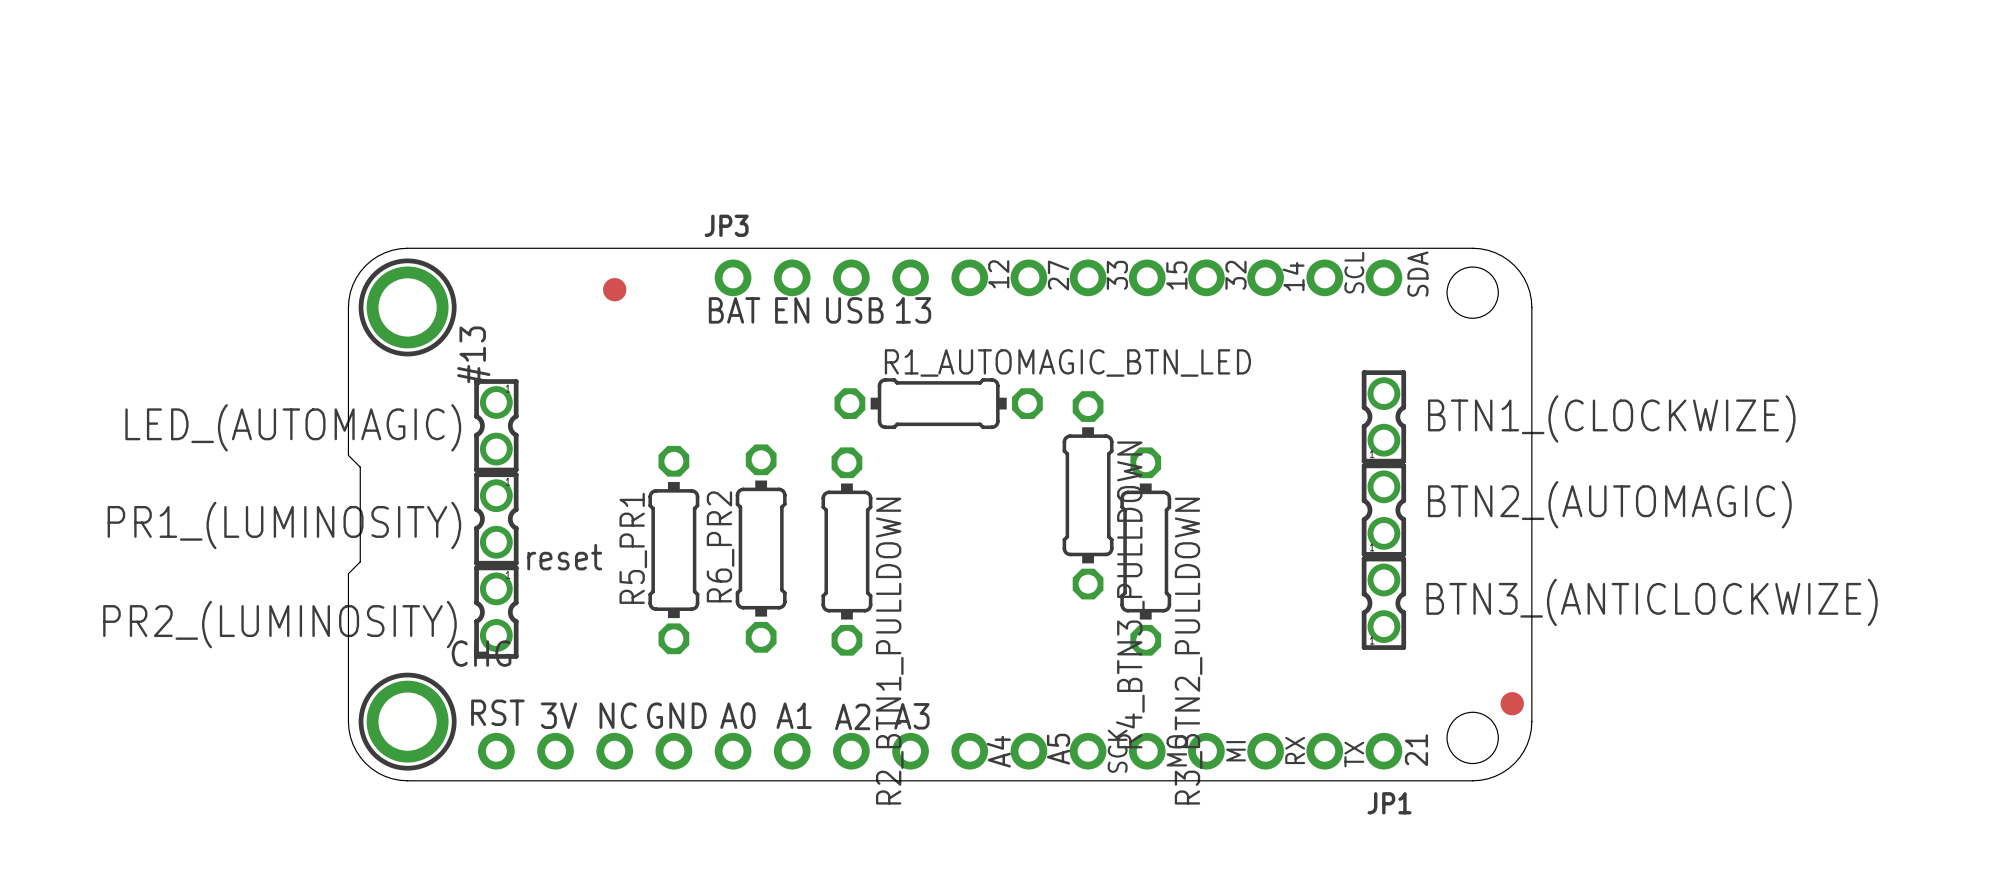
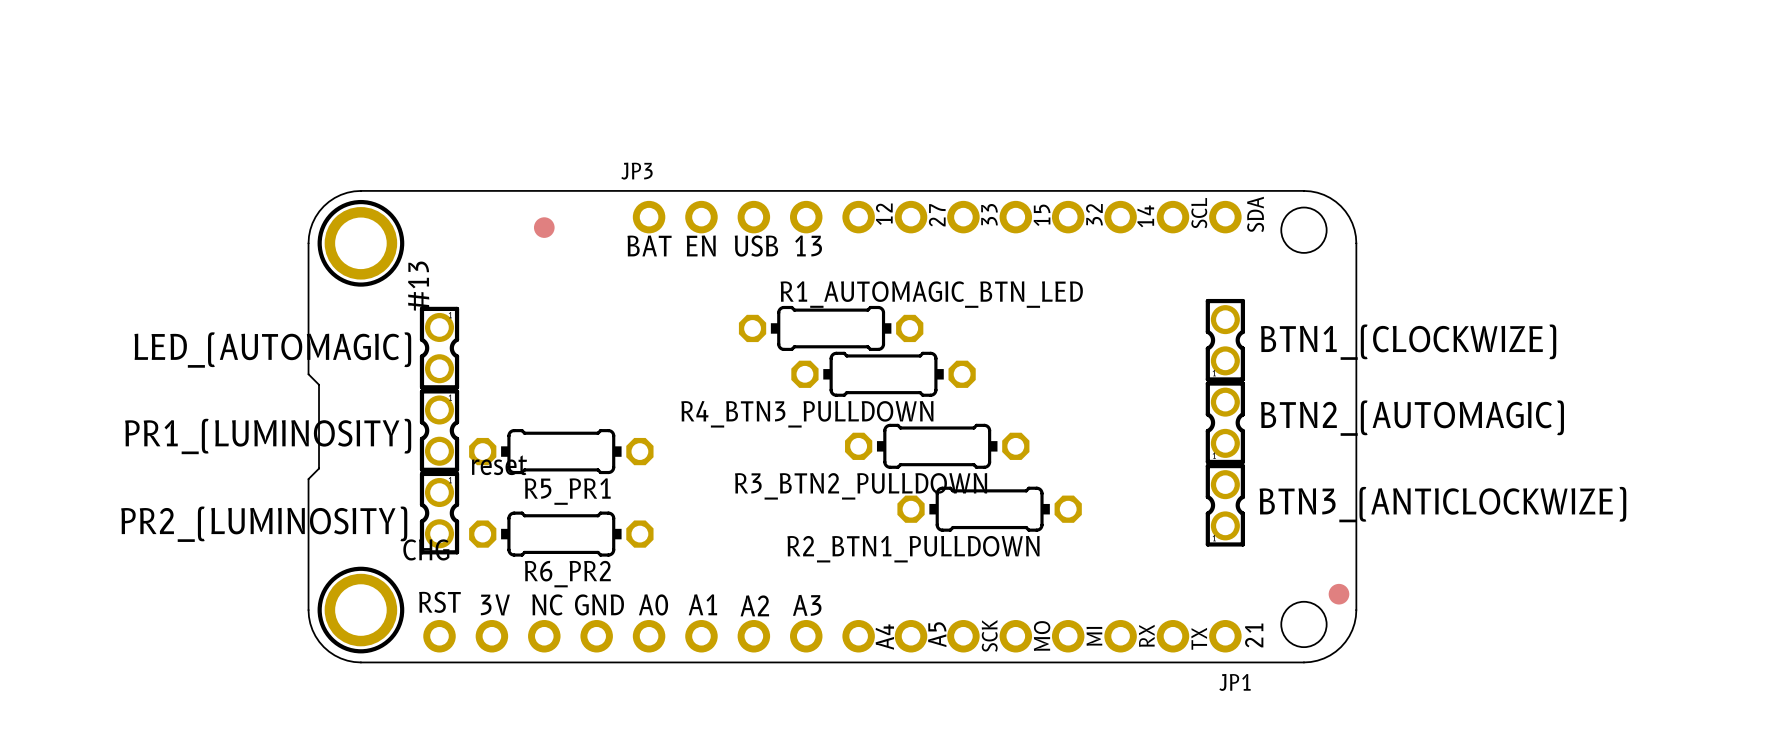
R4_BTN3_PULLDOWN rotation: 0° (1088, 495) -> 90° clockwise (883, 374)
R6_PR2 name position: R6_PR2 (720, 546) -> R6_PR2 (567, 574)
R5_PR1 name position: R5_PR1 (633, 548) -> R5_PR1 (567, 491)
R6_PR2 rotation: 0° (761, 548) -> 90° clockwise (561, 534)
R6_PR2 position: (761, 548) -> (561, 534)
R5_PR1 rotation: 0° (673, 550) -> 90° clockwise (561, 451)
R2_BTN1_PULLDOWN rotation: 0° (846, 551) -> 90° clockwise (989, 509)
R2_BTN1_PULLDOWN position: (846, 551) -> (989, 509)
R3_BTN2_PULLDOWN rotation: 0° (1145, 551) -> 90° clockwise (937, 446)

